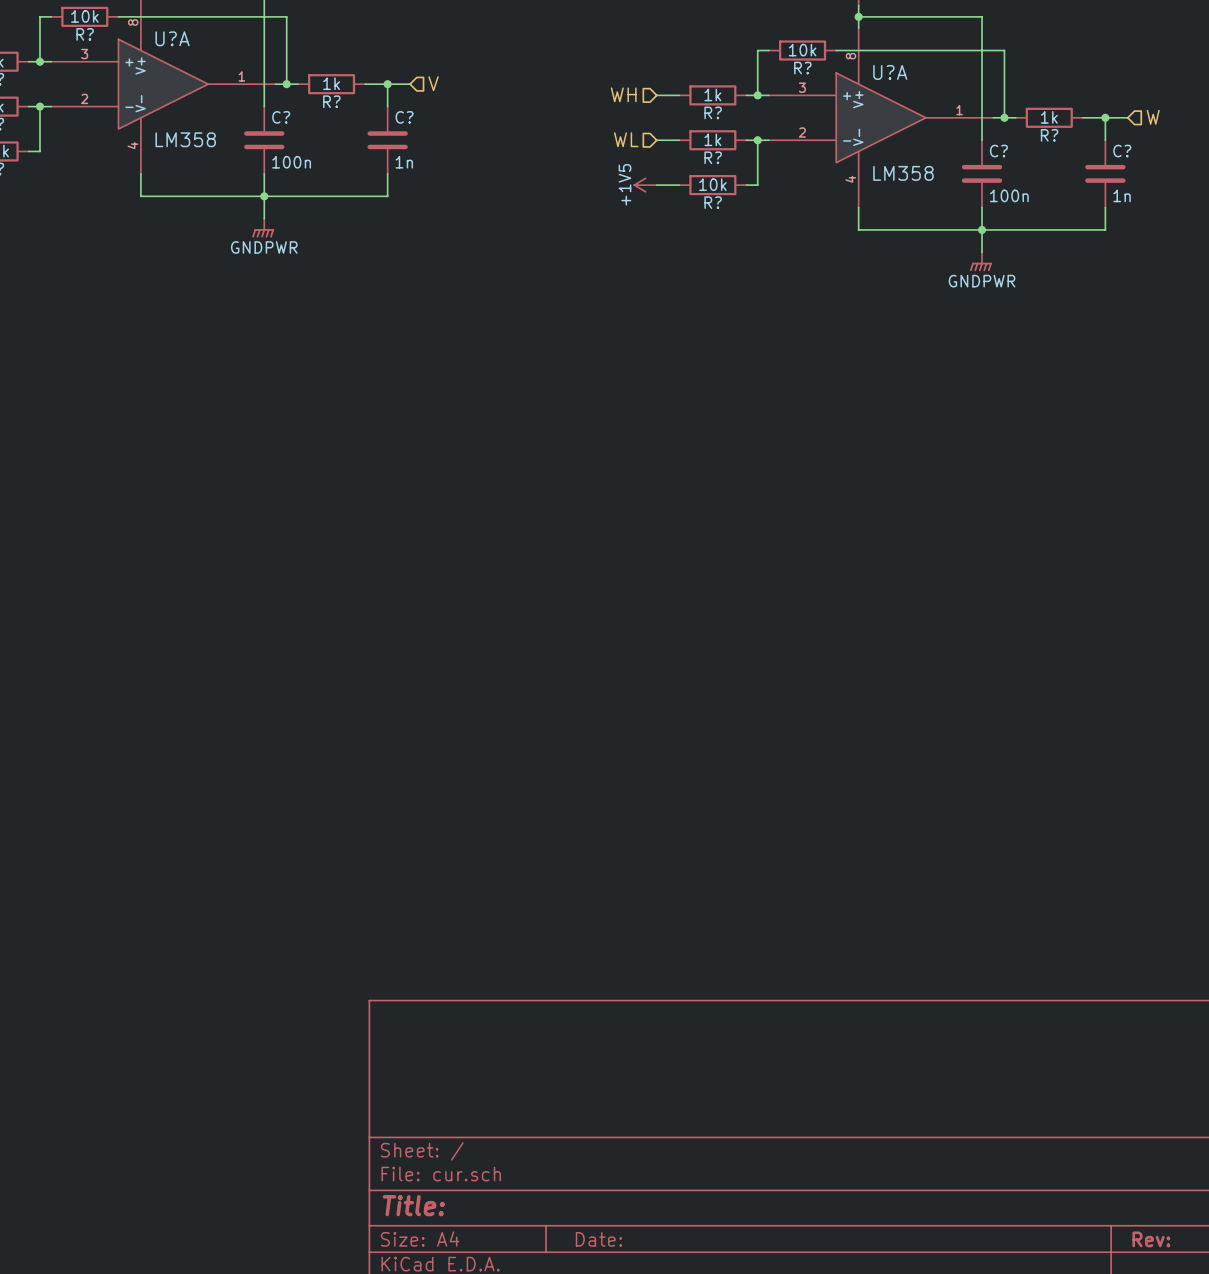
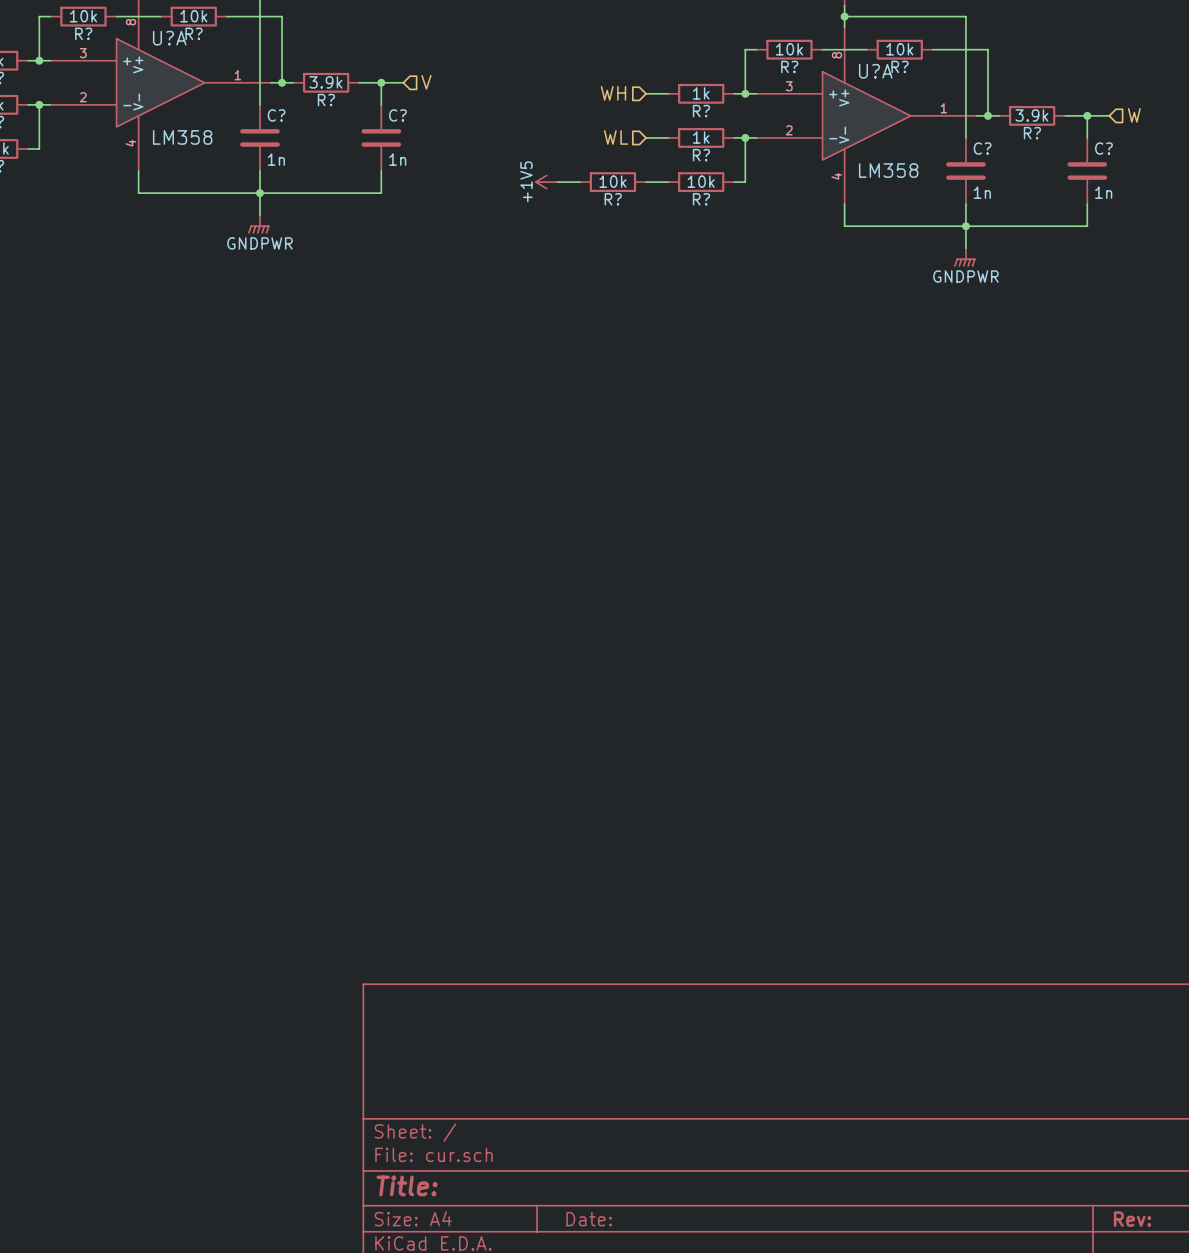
wire: (163, 16) (230, 16) -> none
R?: none -> 10k (193, 16)
wire: (881, 50) (948, 50) -> none
R?: none -> 10k (899, 49)
R? value: 1k (331, 83) -> 3.9k (325, 82)
R? value: 1k (1049, 117) -> 3.9k (1031, 115)
C? value: 100n (291, 162) -> 1n (276, 159)
wire: none -> (557, 182) (579, 182)
R?: none -> 10k (612, 182)
power symbol position: +1V5 (645, 185) -> +1V5 (546, 182)
C? value: 100n (1009, 195) -> 1n (982, 192)

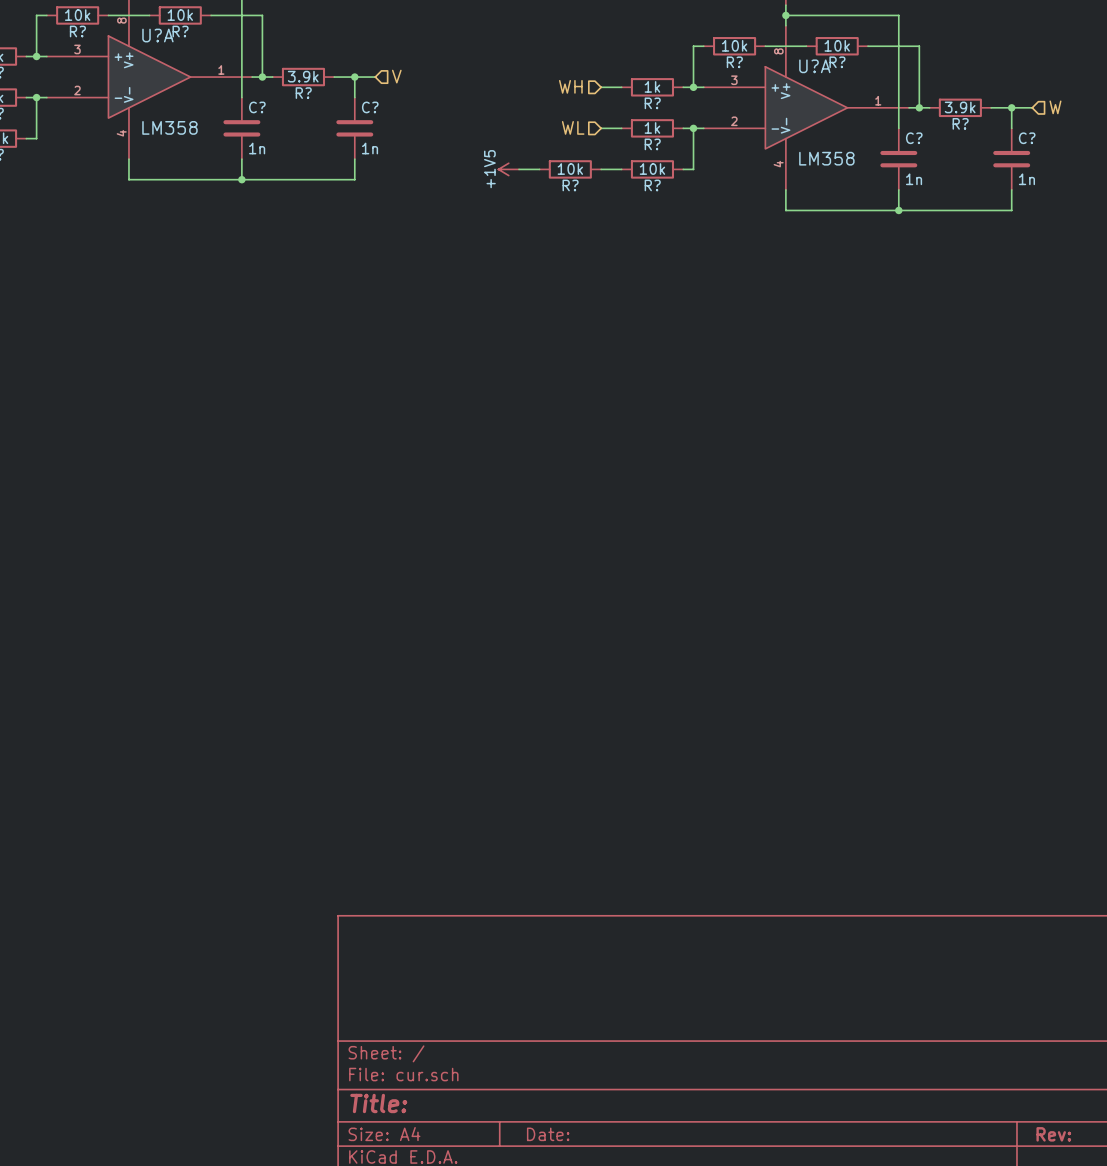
wire: (259, 193) (259, 215) -> none
power symbol: GNDPWR (258, 224) -> none
wire: (965, 226) (965, 248) -> none
power symbol: GNDPWR (964, 257) -> none

